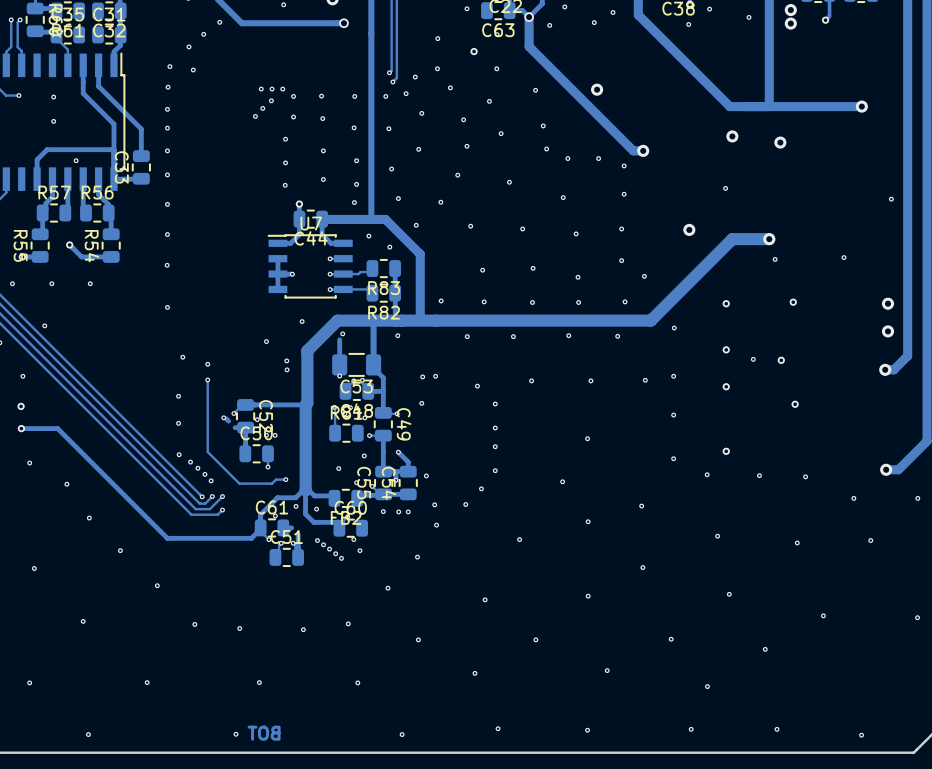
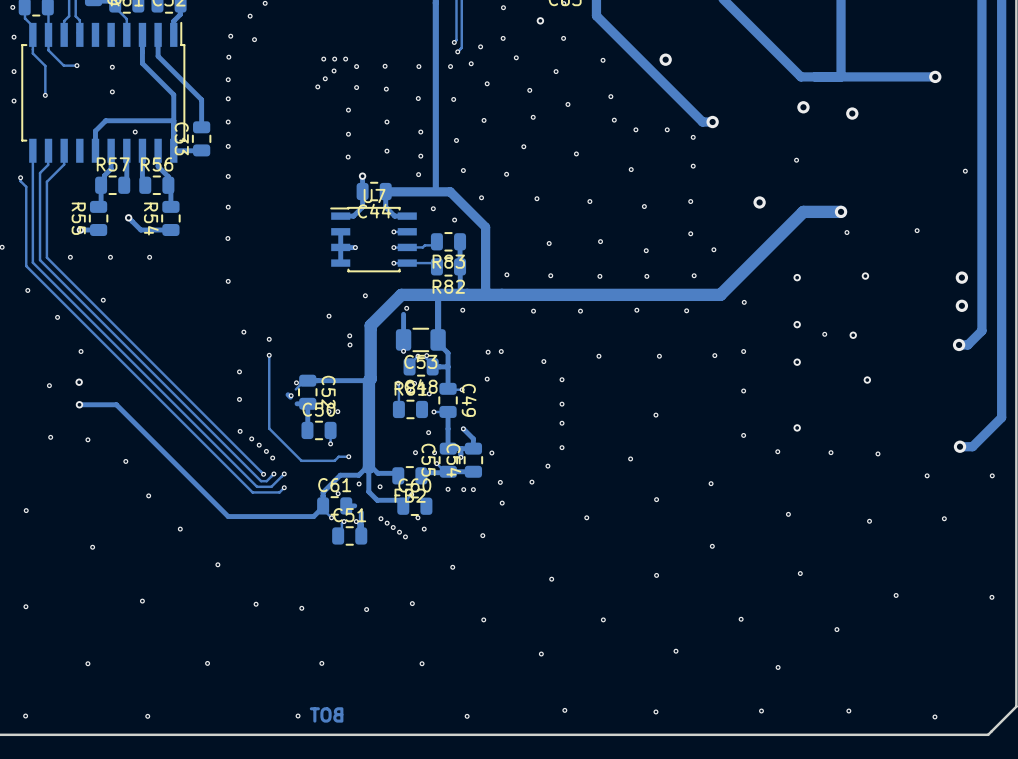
via: none -> (296, 382)
via: (233, 413) -> none
via: (223, 417) -> none
via: none -> (291, 395)
via: (257, 419) -> none
via: (338, 468) -> none
via: none -> (415, 452)
via: none -> (434, 452)
via: (356, 482) -> none

